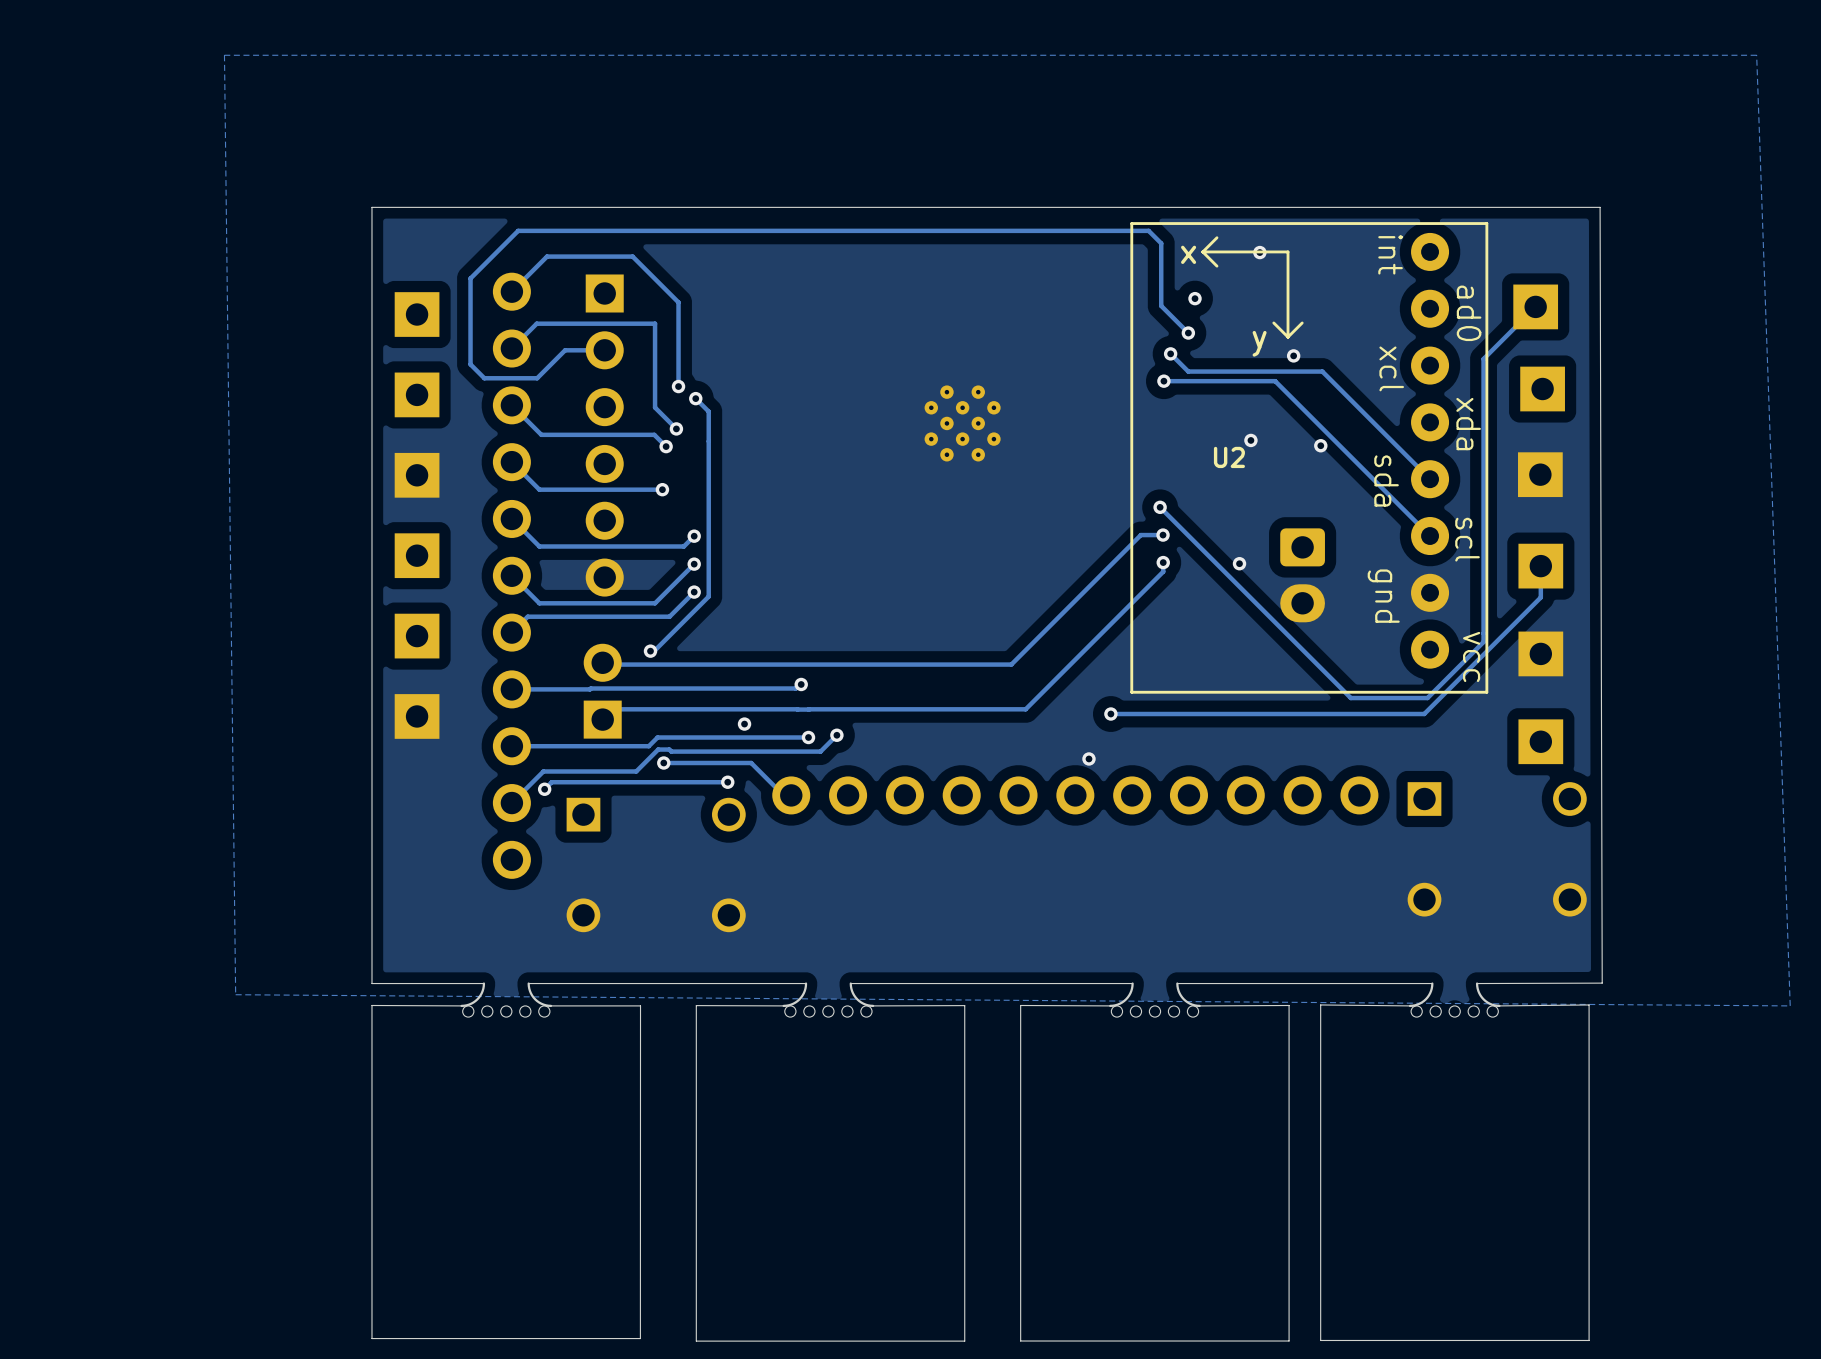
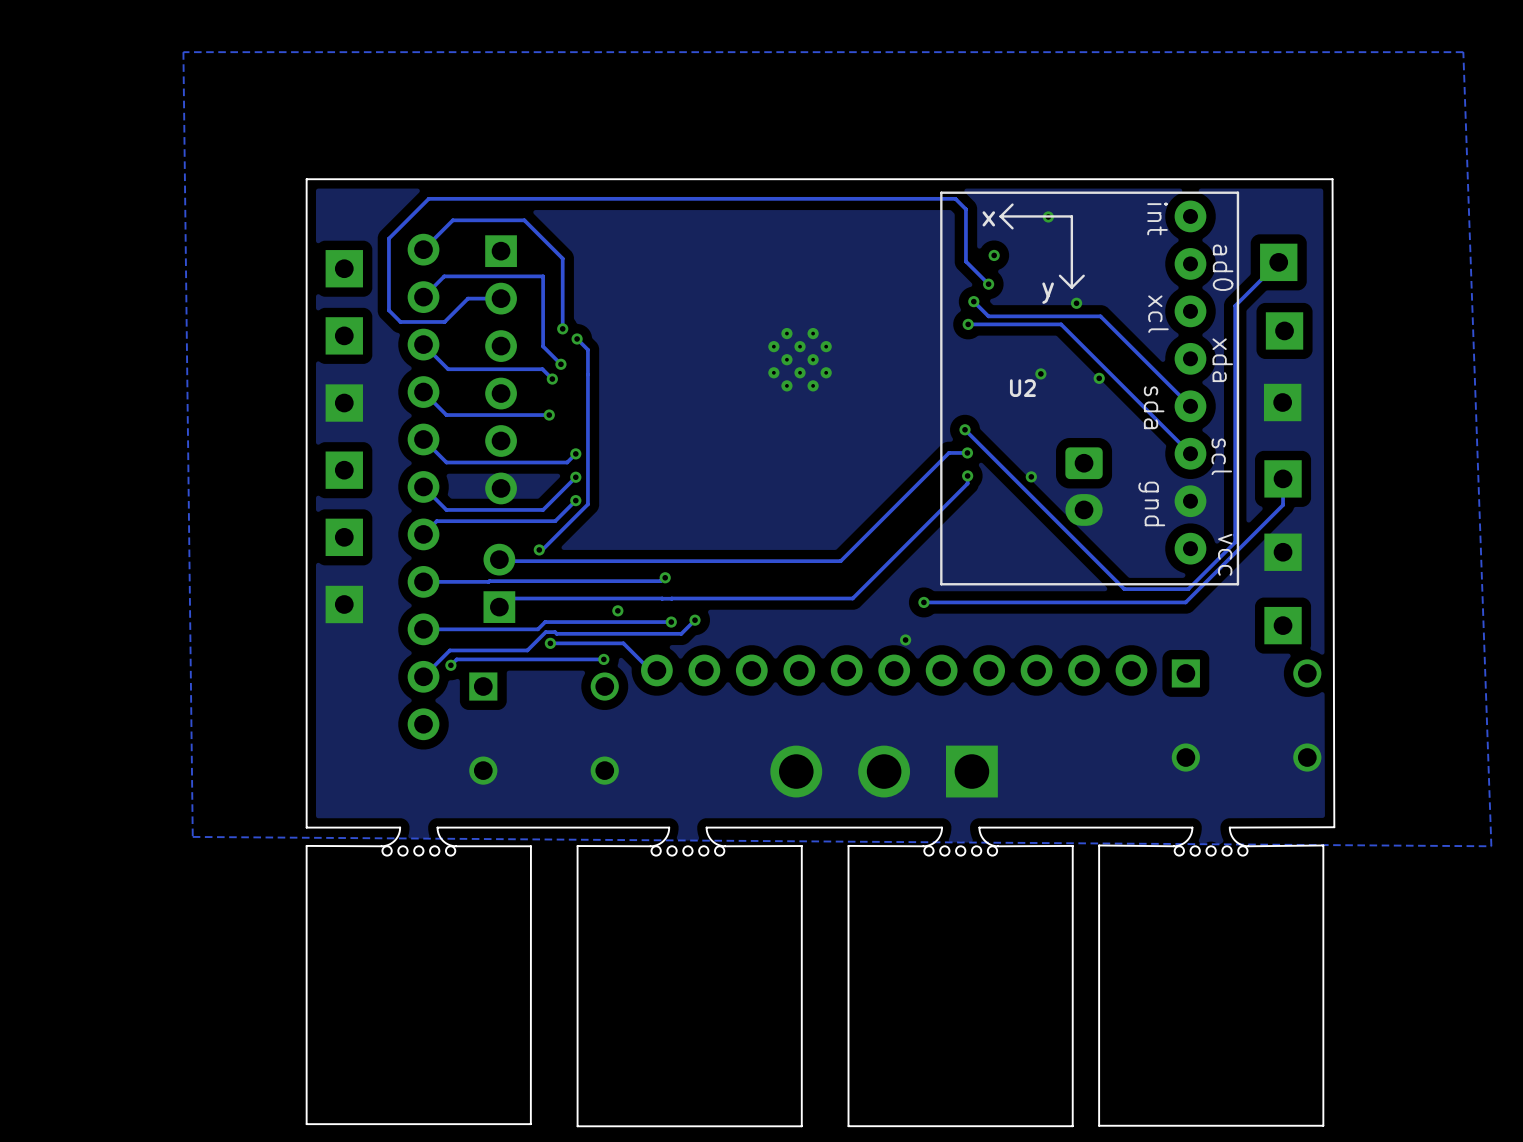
part: none -> (884, 771)

